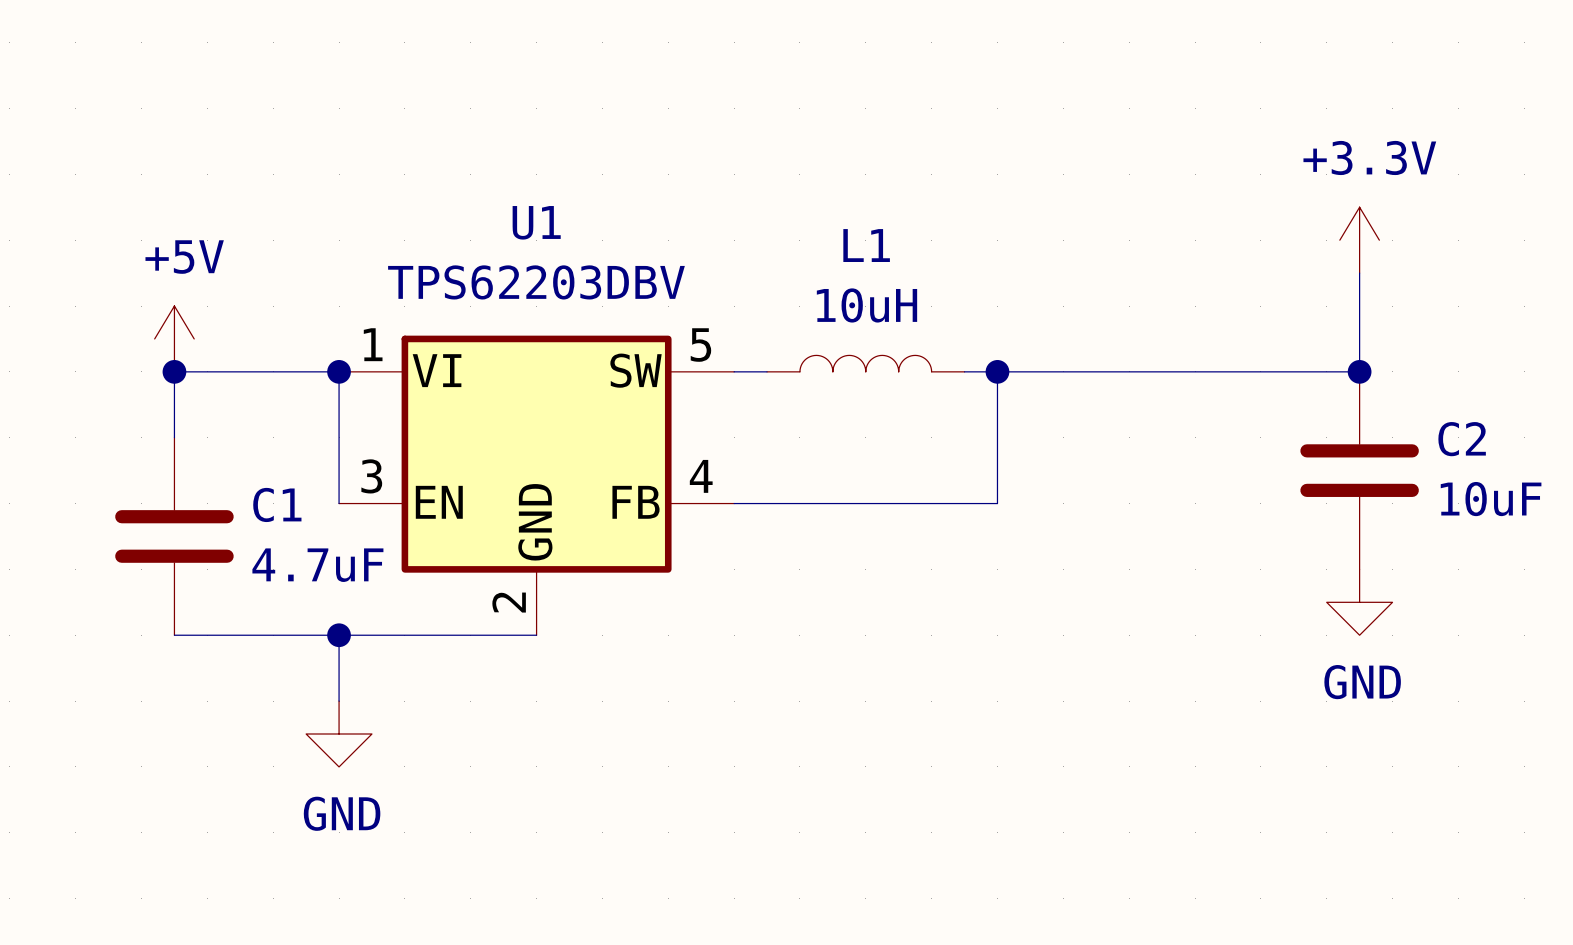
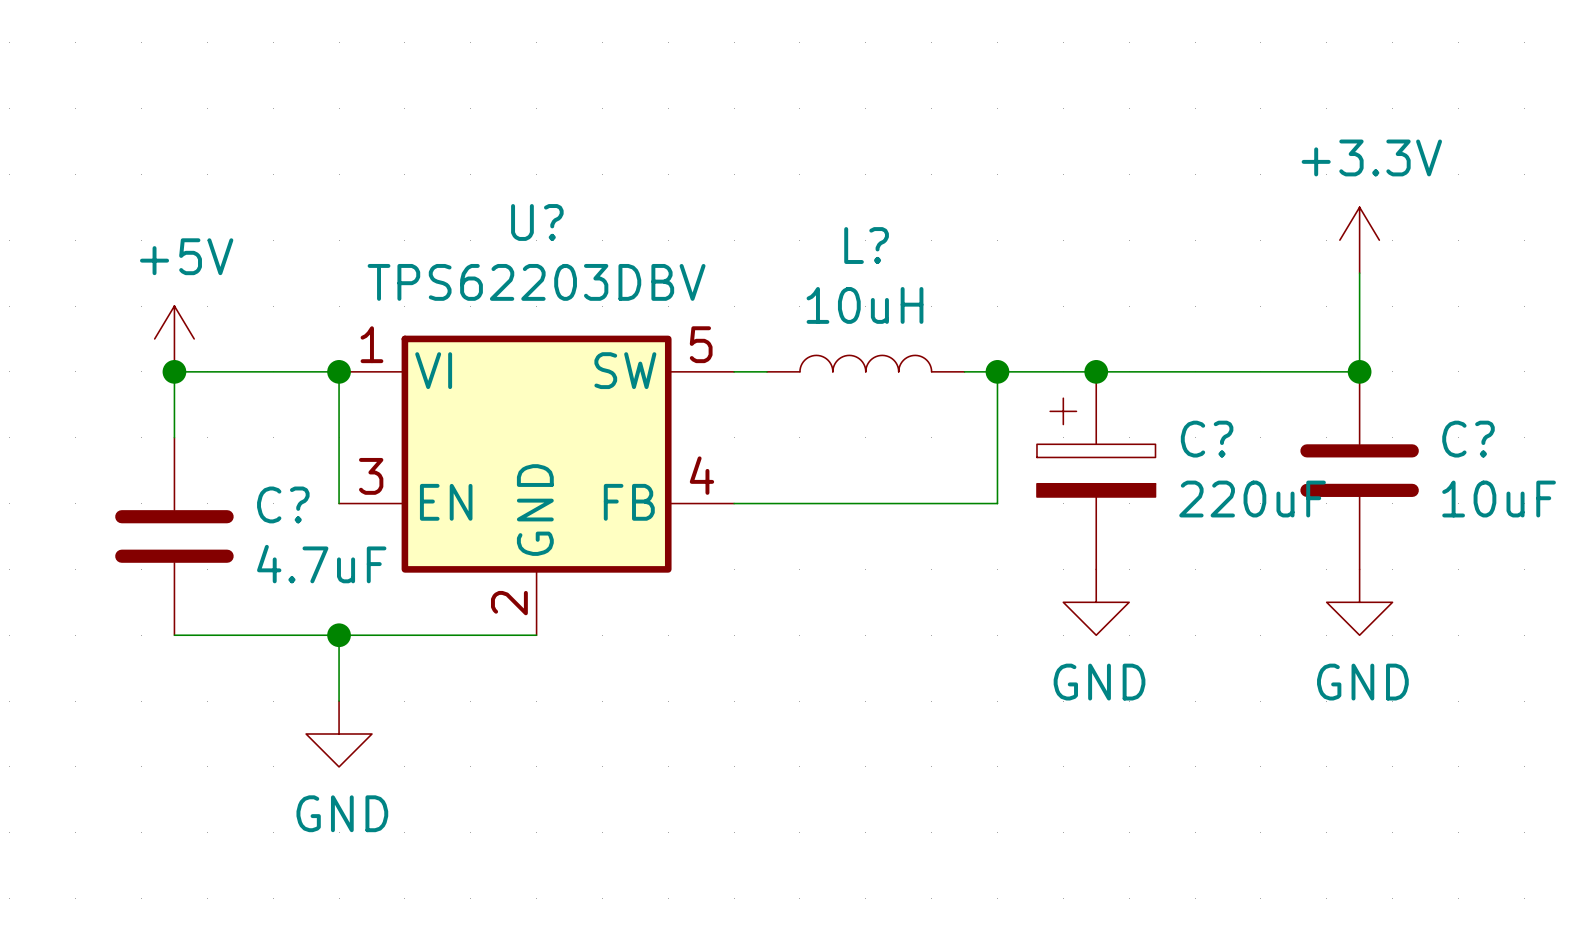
U1 name: U1 (536, 222) -> U? (537, 222)
L1 name: L1 (866, 245) -> L? (866, 245)
junction: none -> (1096, 371)
C2 name: C2 (1462, 439) -> C? (1468, 439)
C?: none -> 220uF (1096, 470)
C1 name: C1 (277, 504) -> C? (283, 504)
power symbol: none -> GND (1096, 602)

